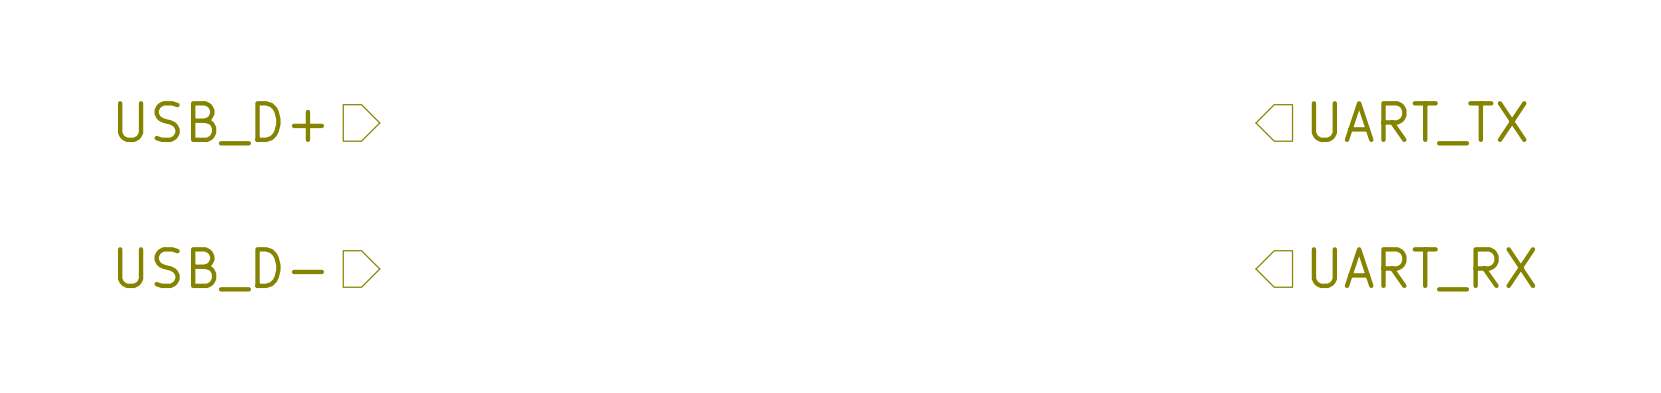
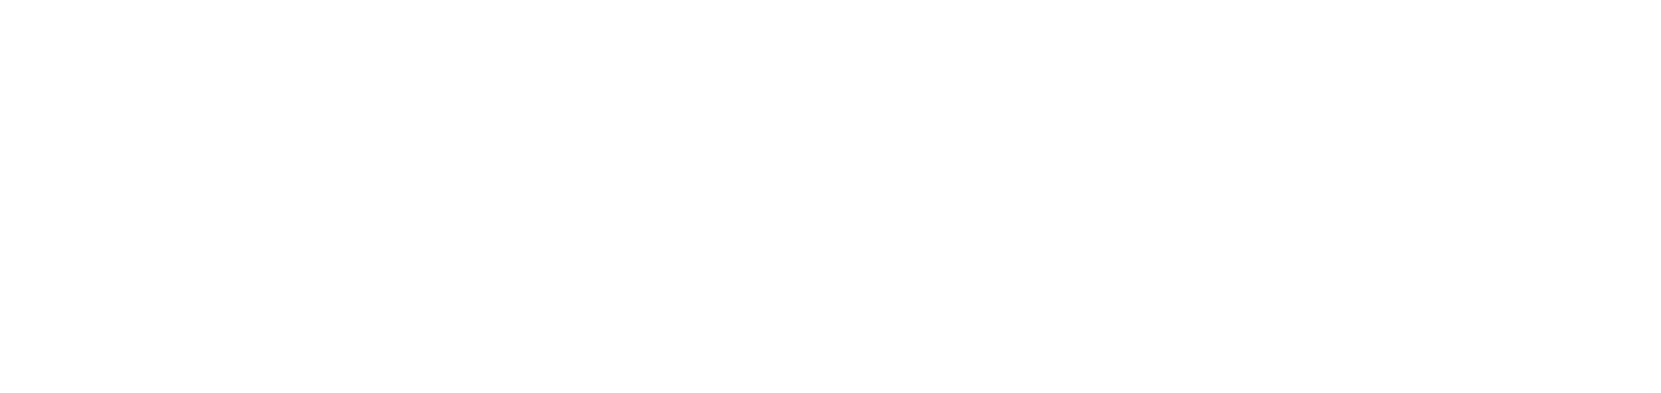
hierarchical label: USB_D+ (221, 123) -> none
hierarchical label: UART_TX (1419, 123) -> none
hierarchical label: USB_D- (221, 269) -> none
hierarchical label: UART_RX (1423, 269) -> none

